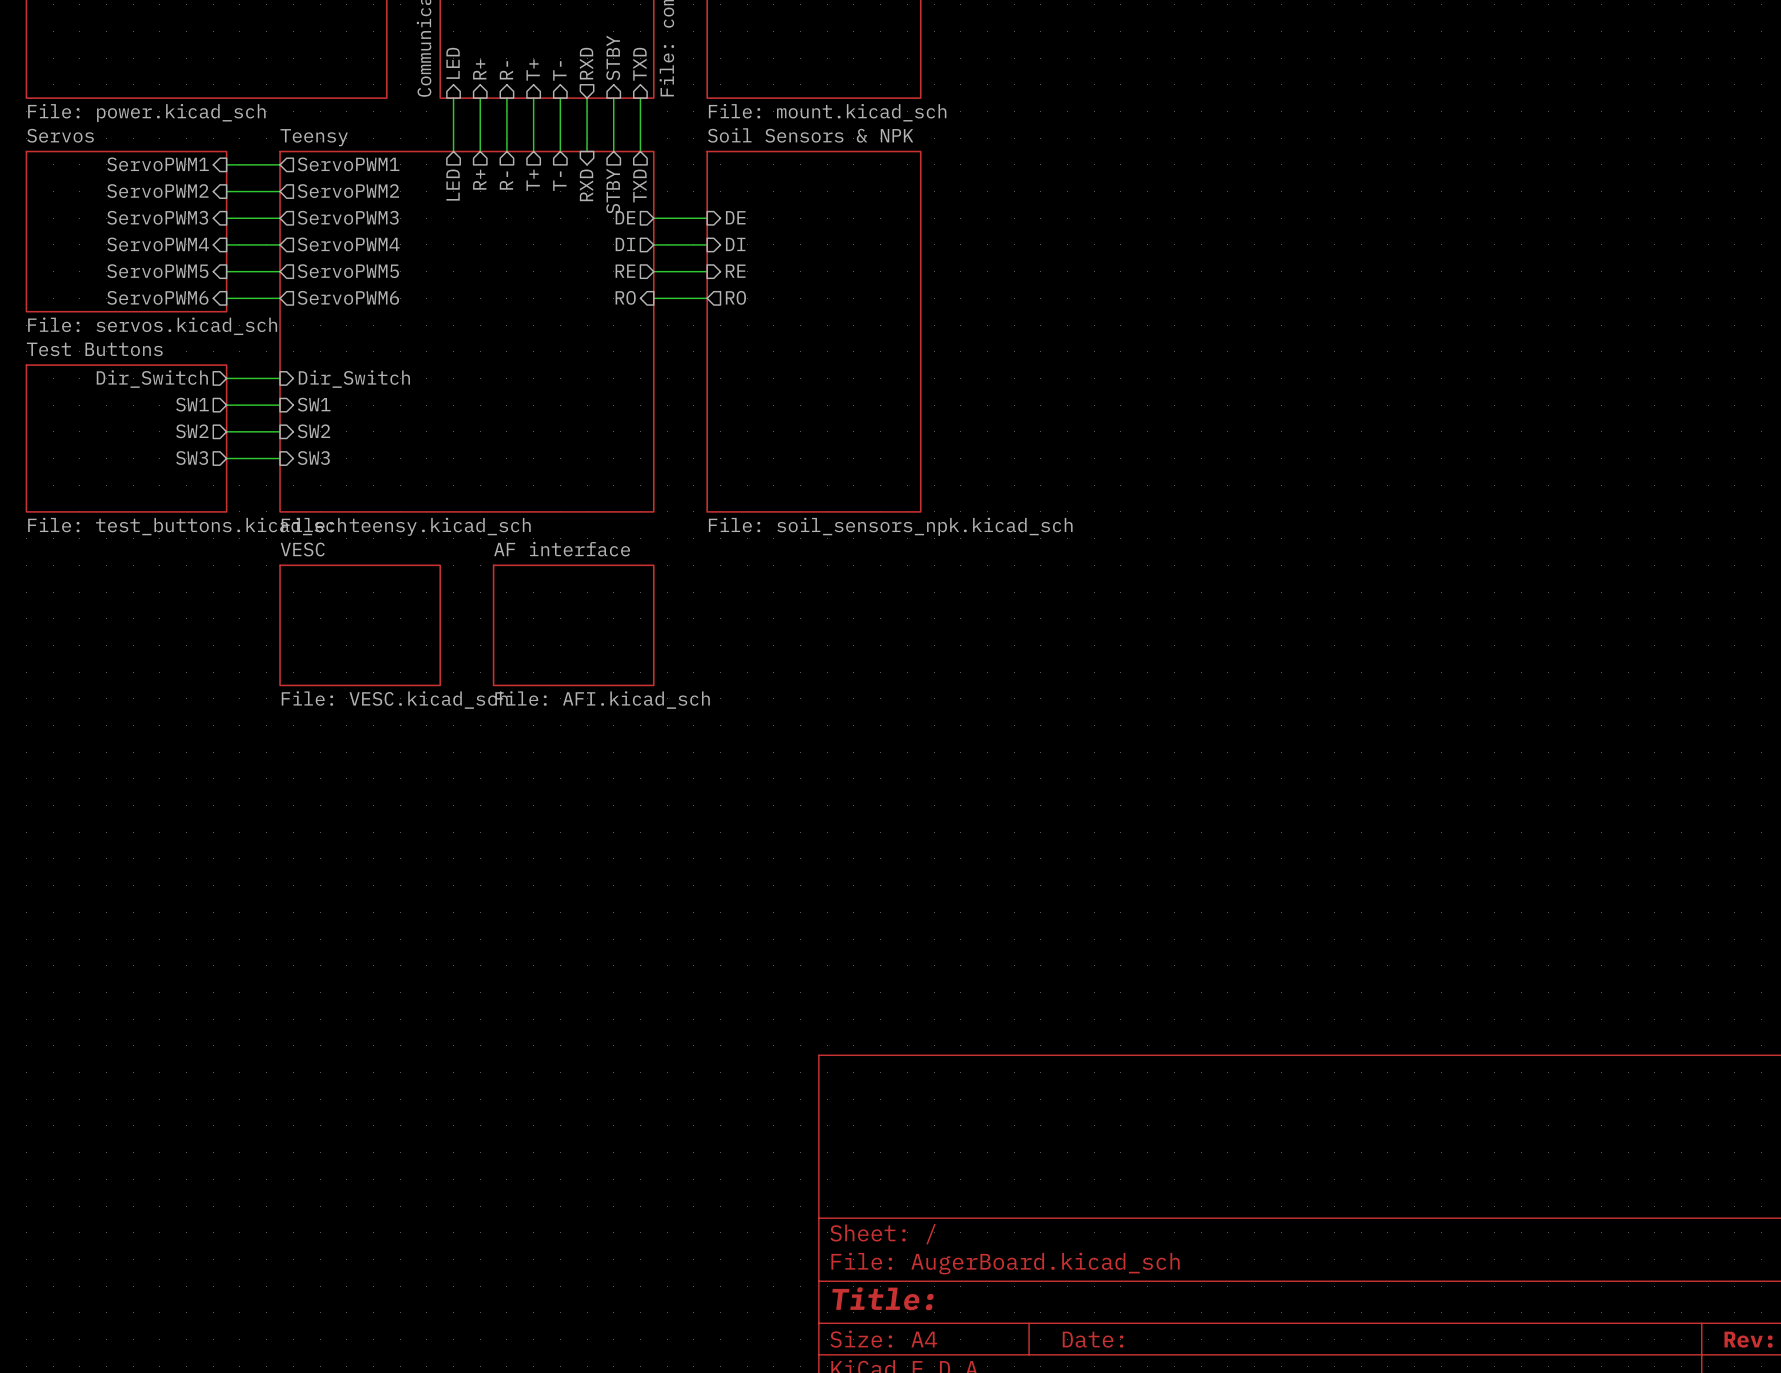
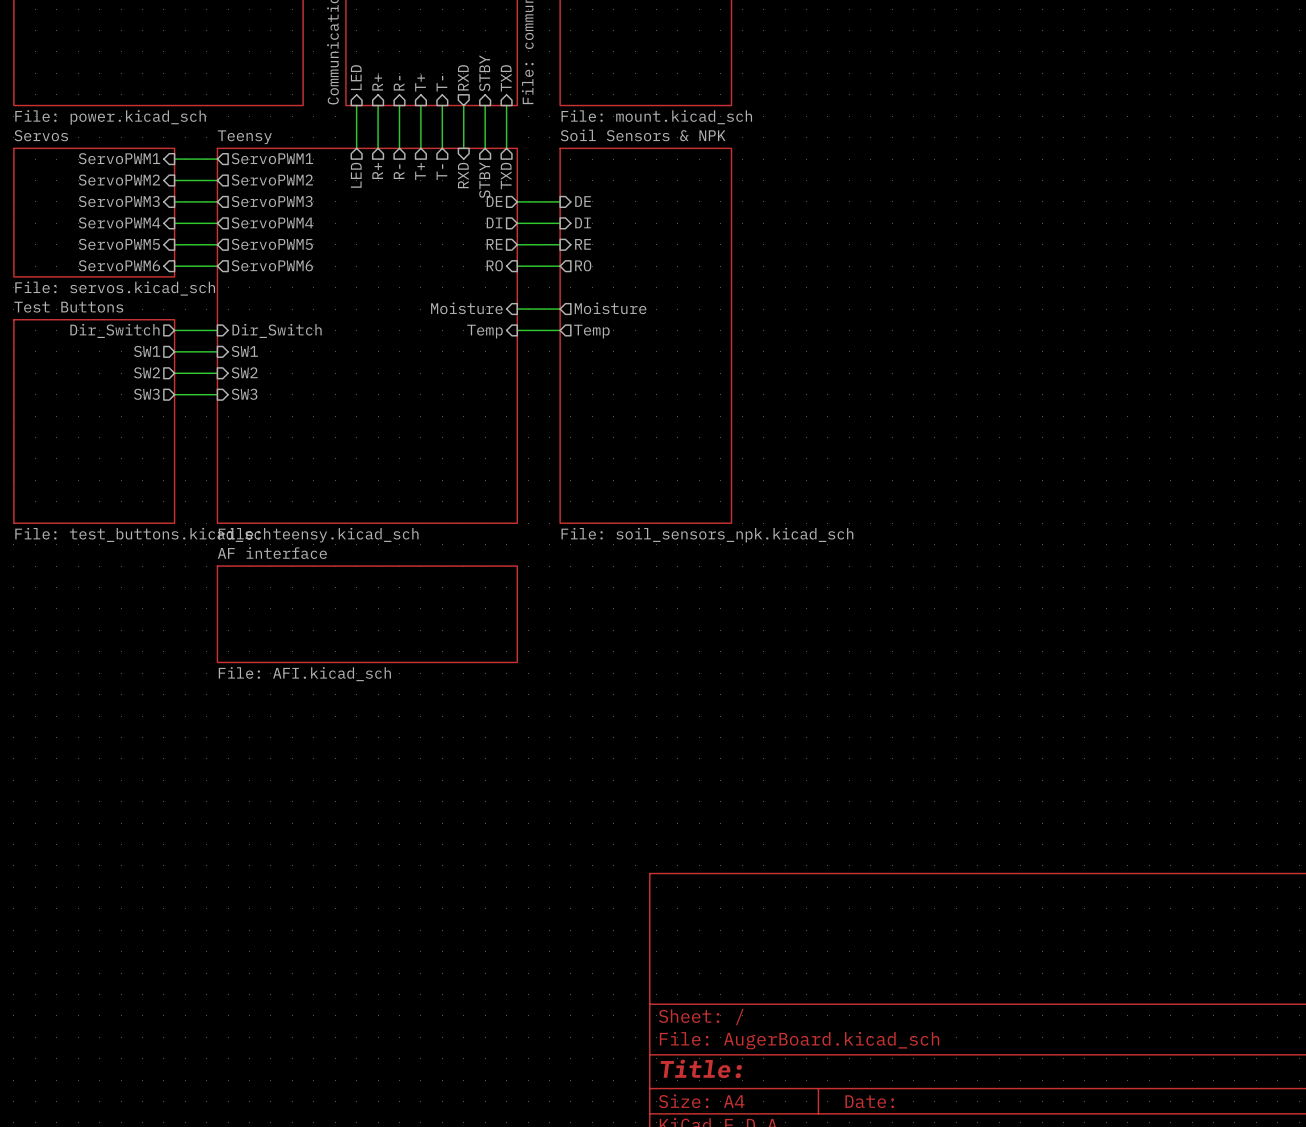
sheet Teensy: File: teensy.kicad_sch (466, 331) -> none
sheet Soil Sensors & NPK: File: soil_sensors_npk.kicad_sch (813, 331) -> none
sheet pin: none -> Moisture (466, 308)
sheet pin: none -> Moisture (610, 308)
wire: none -> (517, 309) (560, 309)
wire: none -> (517, 330) (560, 330)
sheet pin: none -> Temp (485, 331)
sheet pin: none -> Temp (591, 331)
sheet Teensy: none -> File: teensy.kicad_sch (367, 335)
sheet Soil Sensors & NPK: none -> File: soil_sensors_npk.kicad_sch (645, 335)
sheet Test Buttons: File: test_buttons.kicad_sch (126, 438) -> none
sheet Test Buttons: none -> File: test_buttons.kicad_sch (94, 421)
sheet VESC: File: VESC.kicad_sch (360, 625) -> none
sheet AF interface: File: AFI.kicad_sch (573, 625) -> none
sheet AF interface: none -> File: AFI.kicad_sch (367, 614)

